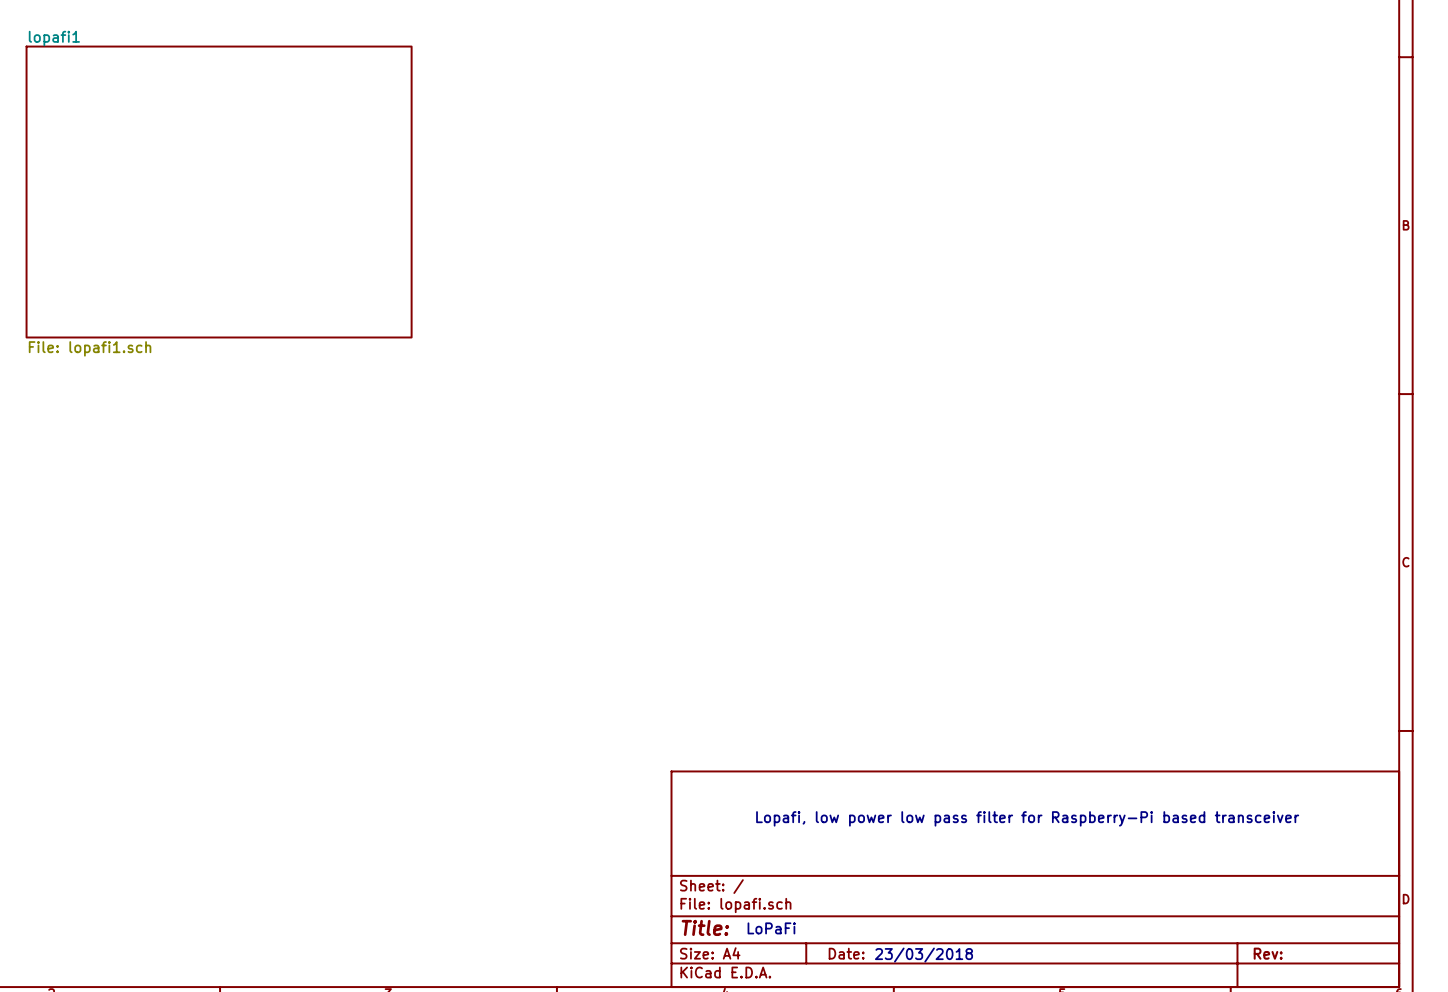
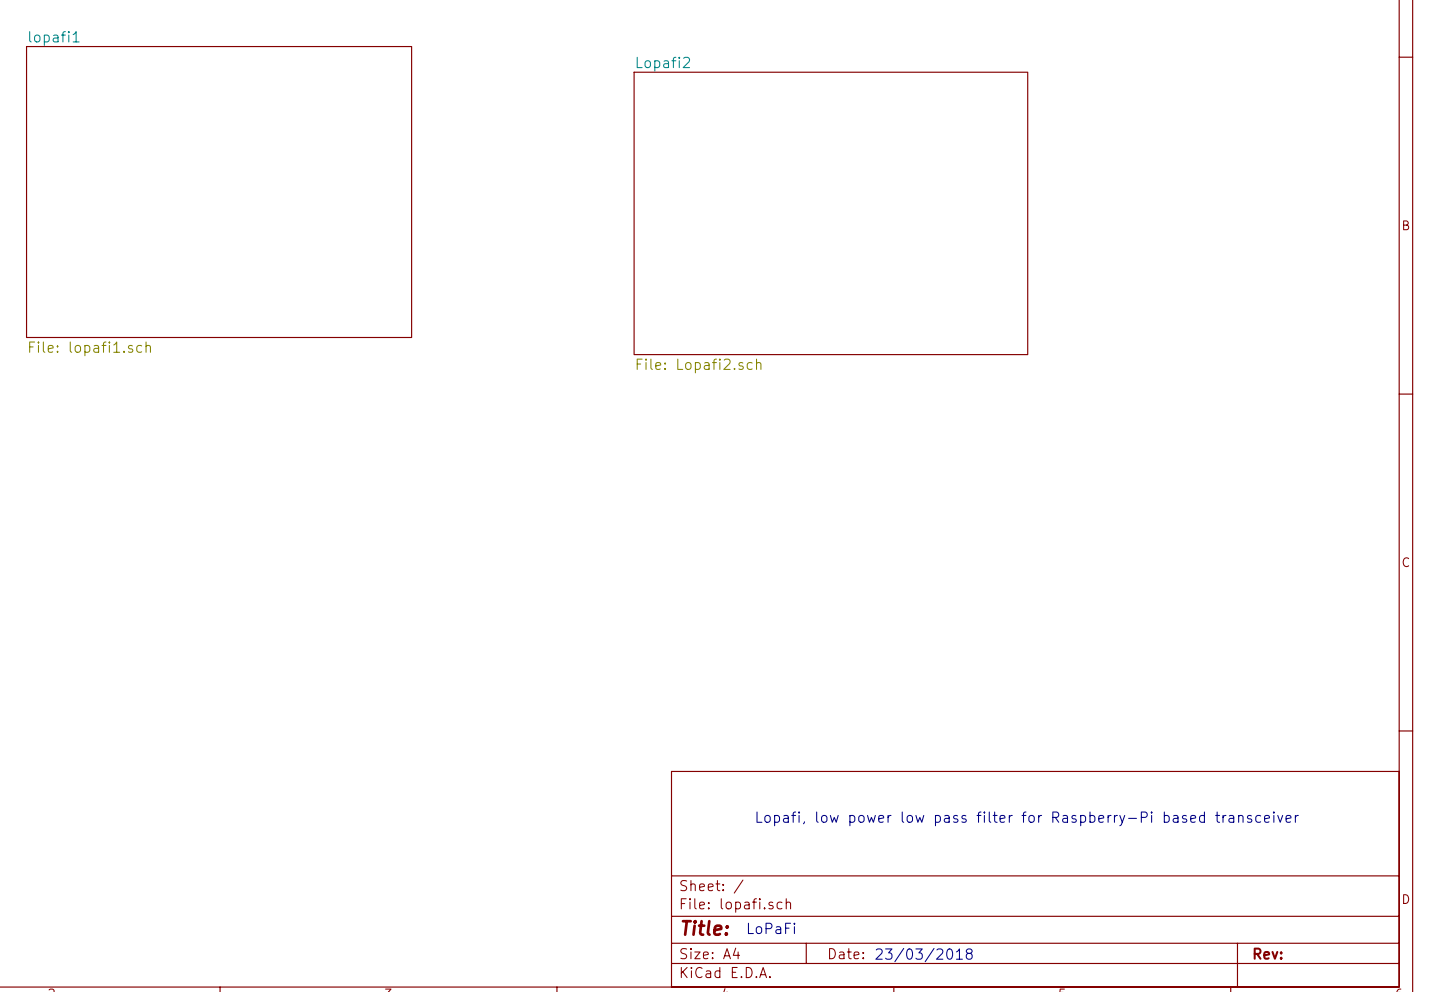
sheet Lopafi2: none -> File: Lopafi2.sch (830, 213)

